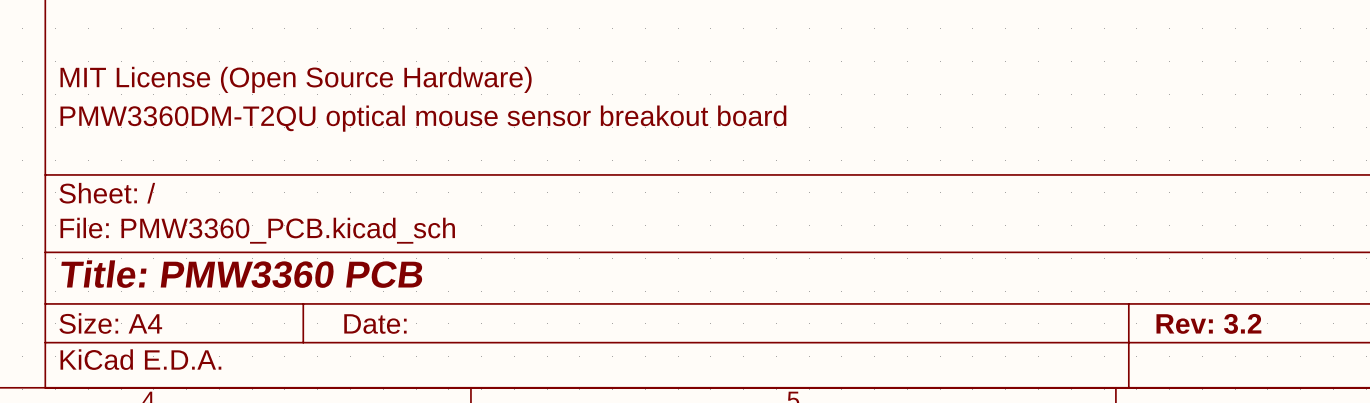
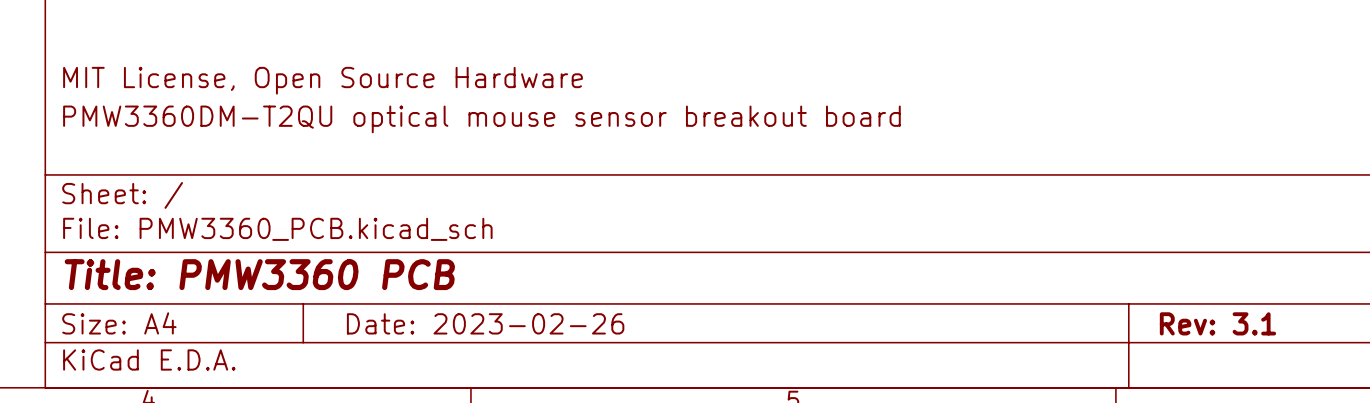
title block: MIT License (Open Source Hardware) (296, 79) -> MIT License, Open Source Hardware (323, 80)
title block: Rev: 3.2 (1208, 323) -> Rev: 3.1 (1217, 323)
title block: Date: (375, 324) -> Date: 2023-02-26 (485, 323)

